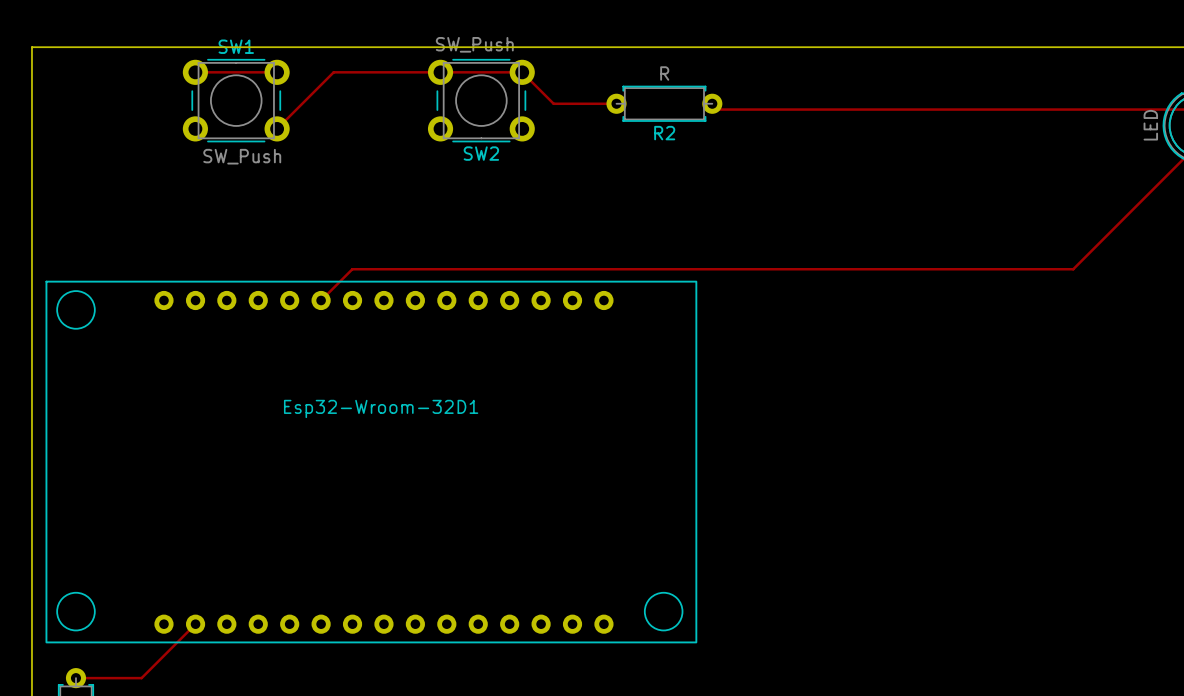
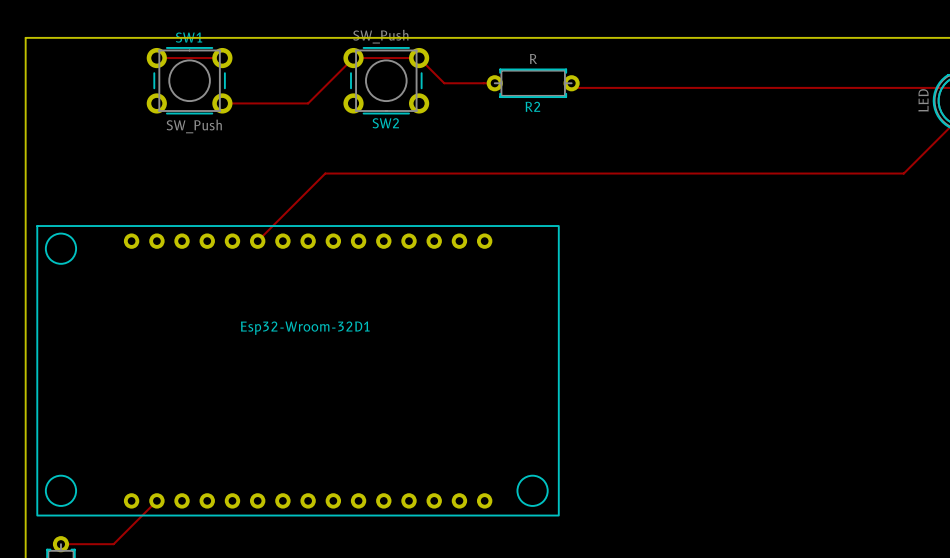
track: (440, 72) (333, 72) (277, 128) -> (353, 58) (308, 103) (222, 103)
track: (1126, 216) (1073, 269) (352, 269) (321, 300) -> (903, 173) (325, 173) (257, 241)

